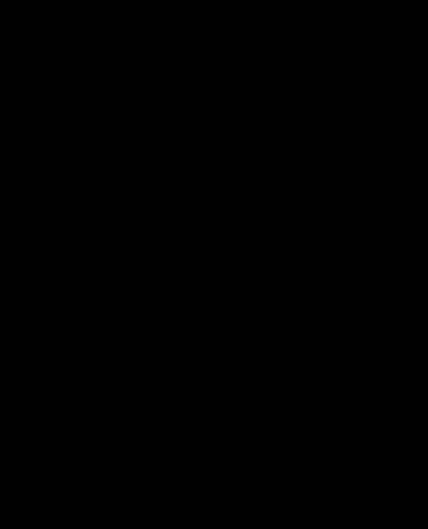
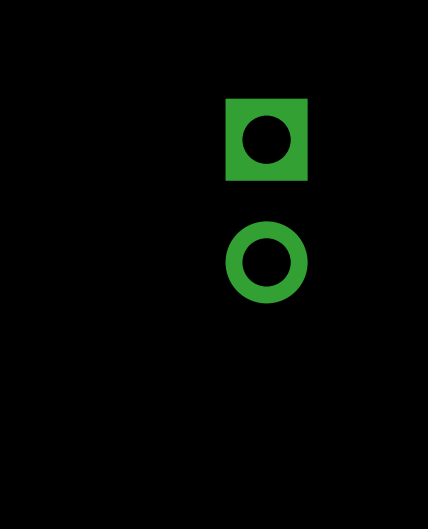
part: none -> (266, 201)

